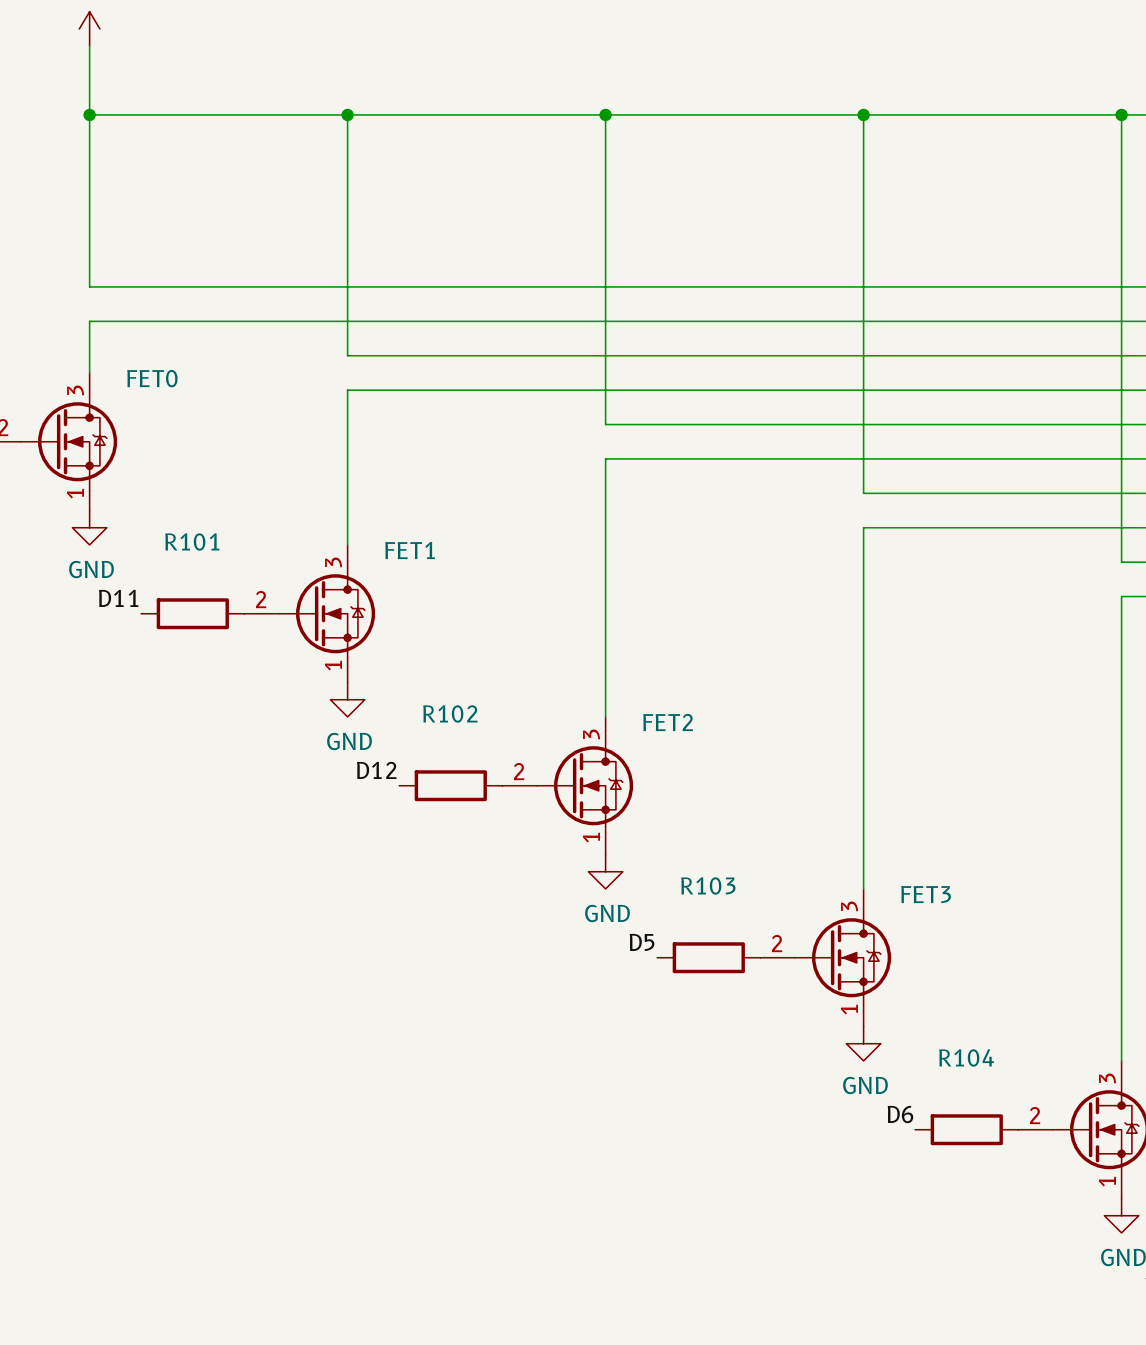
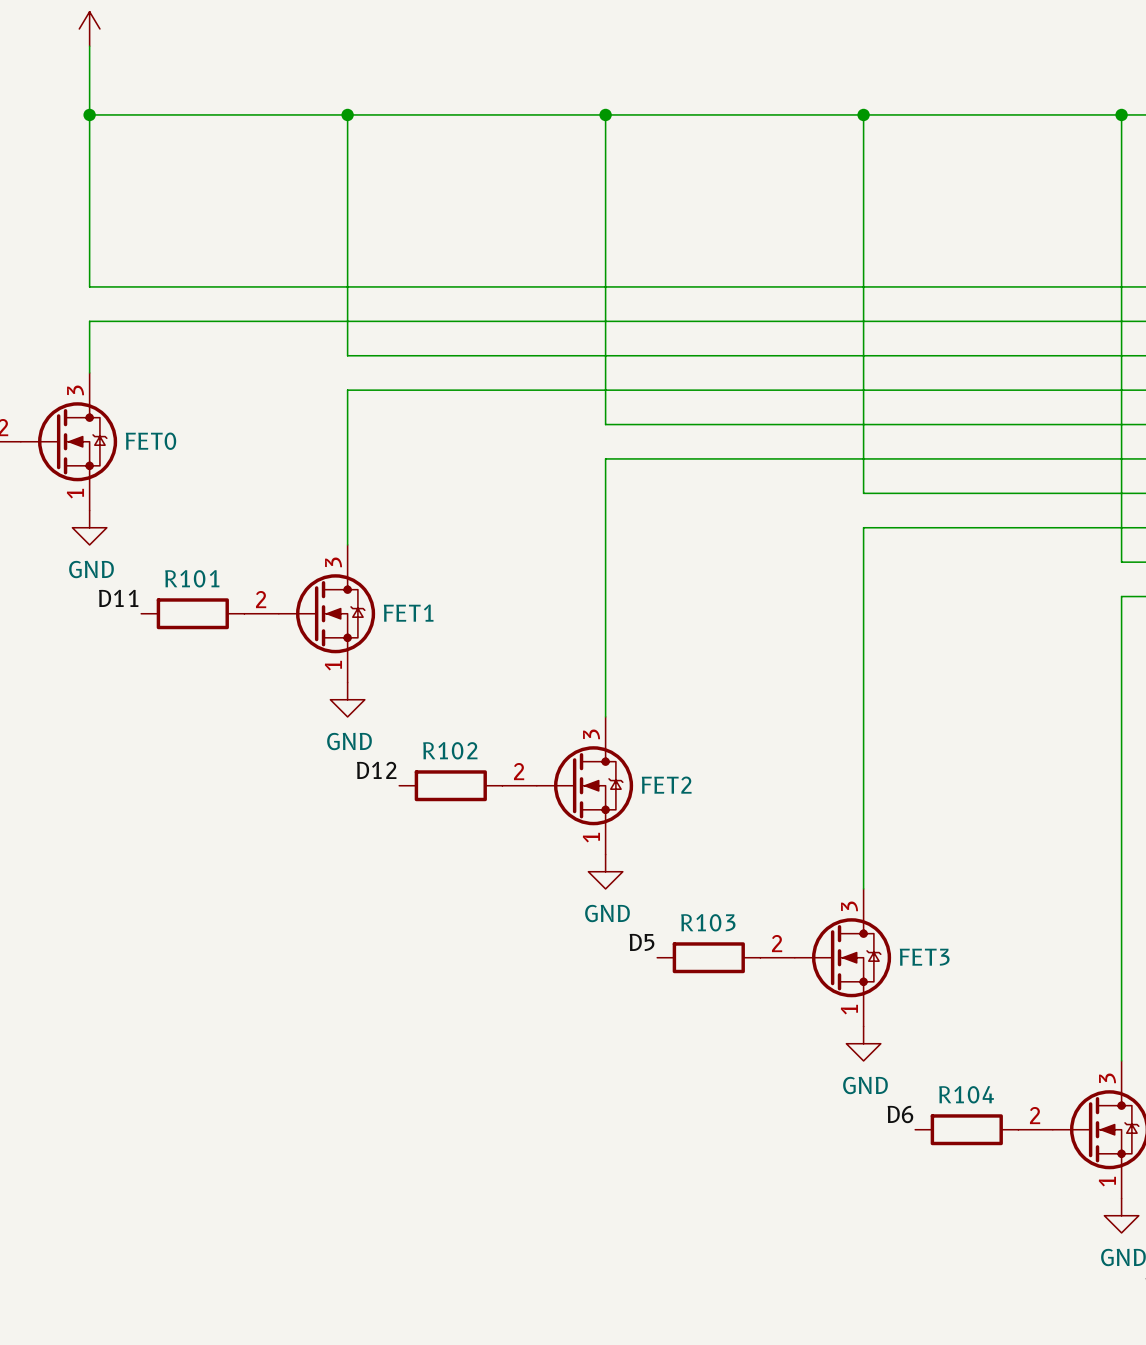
FET0 name position: FET0 (152, 378) -> FET0 (151, 441)
R101 name position: R101 (192, 541) -> R101 (192, 578)
FET1 name position: FET1 (410, 550) -> FET1 (408, 613)
R102 name position: R102 (450, 713) -> R102 (450, 750)
FET2 name position: FET2 (668, 722) -> FET2 (666, 785)
R103 name position: R103 (708, 885) -> R103 (708, 922)
FET3 name position: FET3 (926, 894) -> FET3 (924, 957)
R104 name position: R104 (966, 1057) -> R104 (966, 1094)

